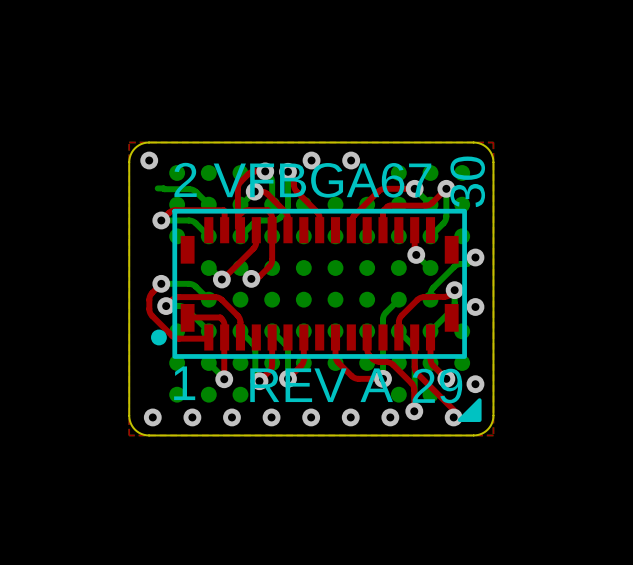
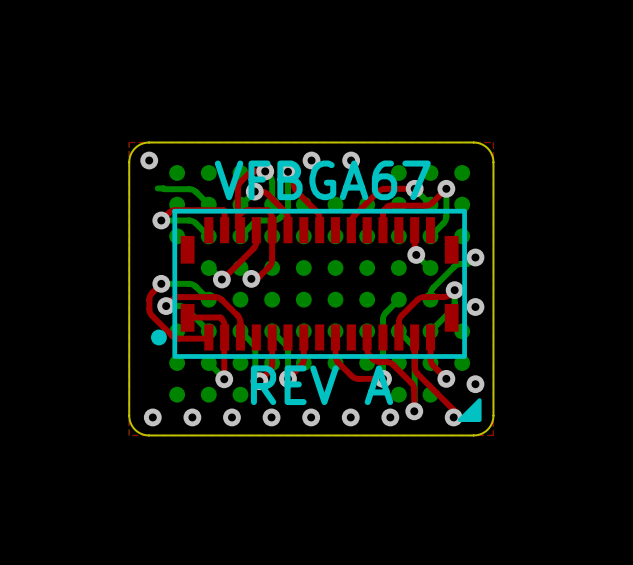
text: 2 (185, 179) -> none
text: 30 (467, 181) -> none
text: 1 (184, 383) -> none
text: 29 (437, 386) -> none

